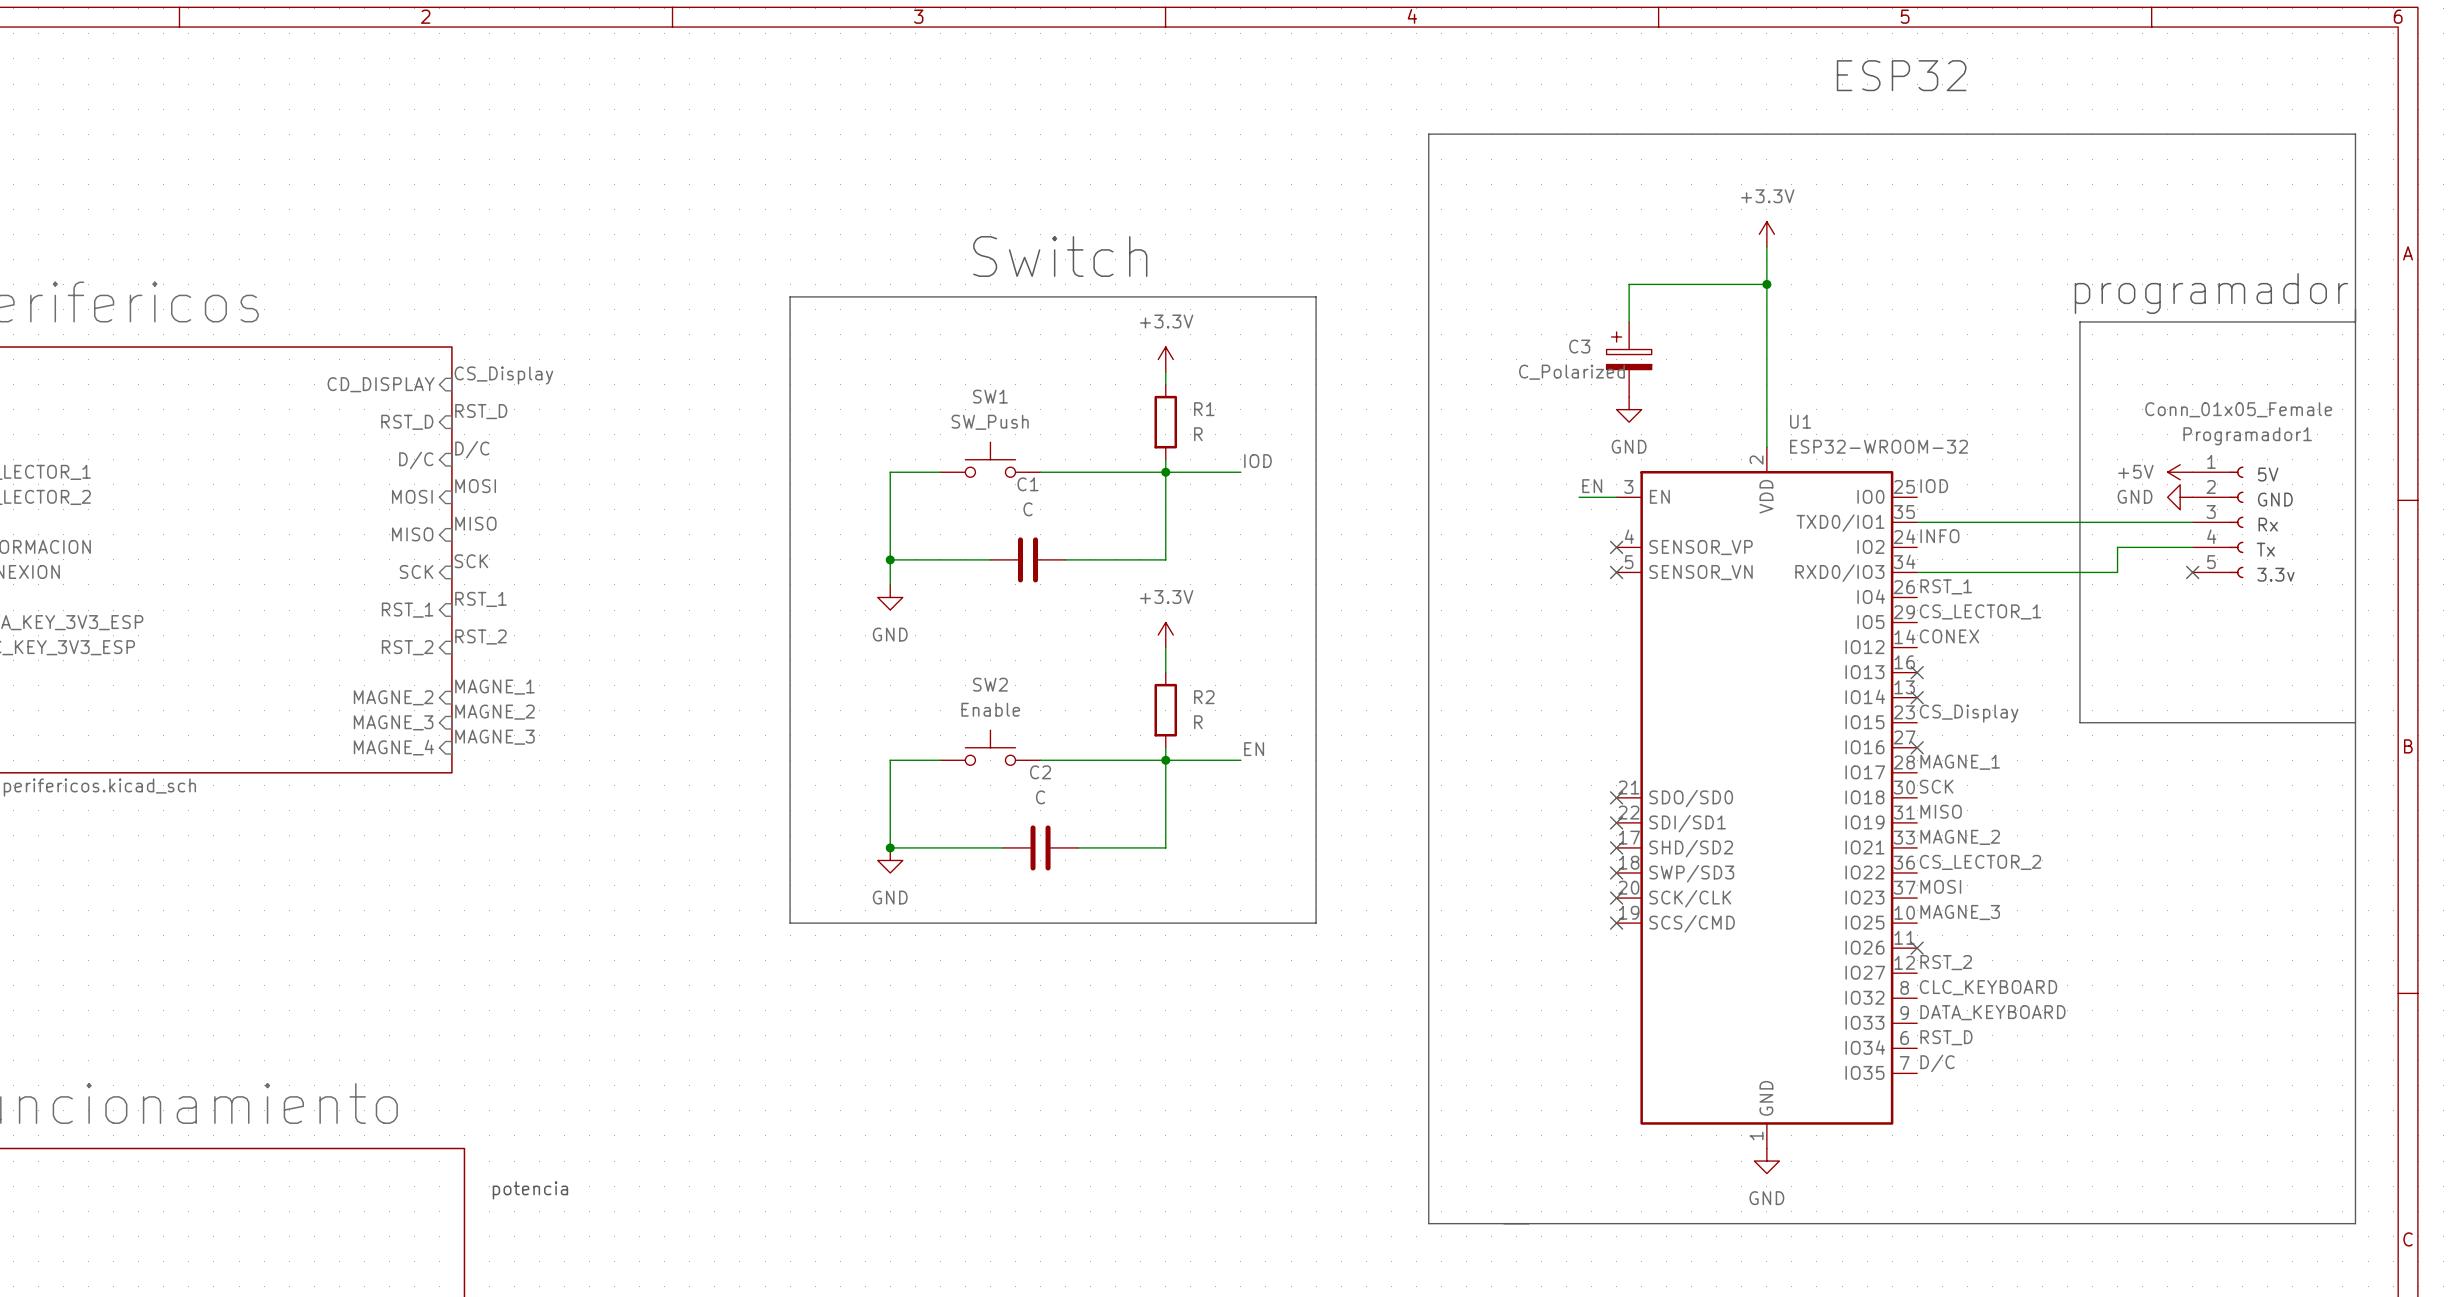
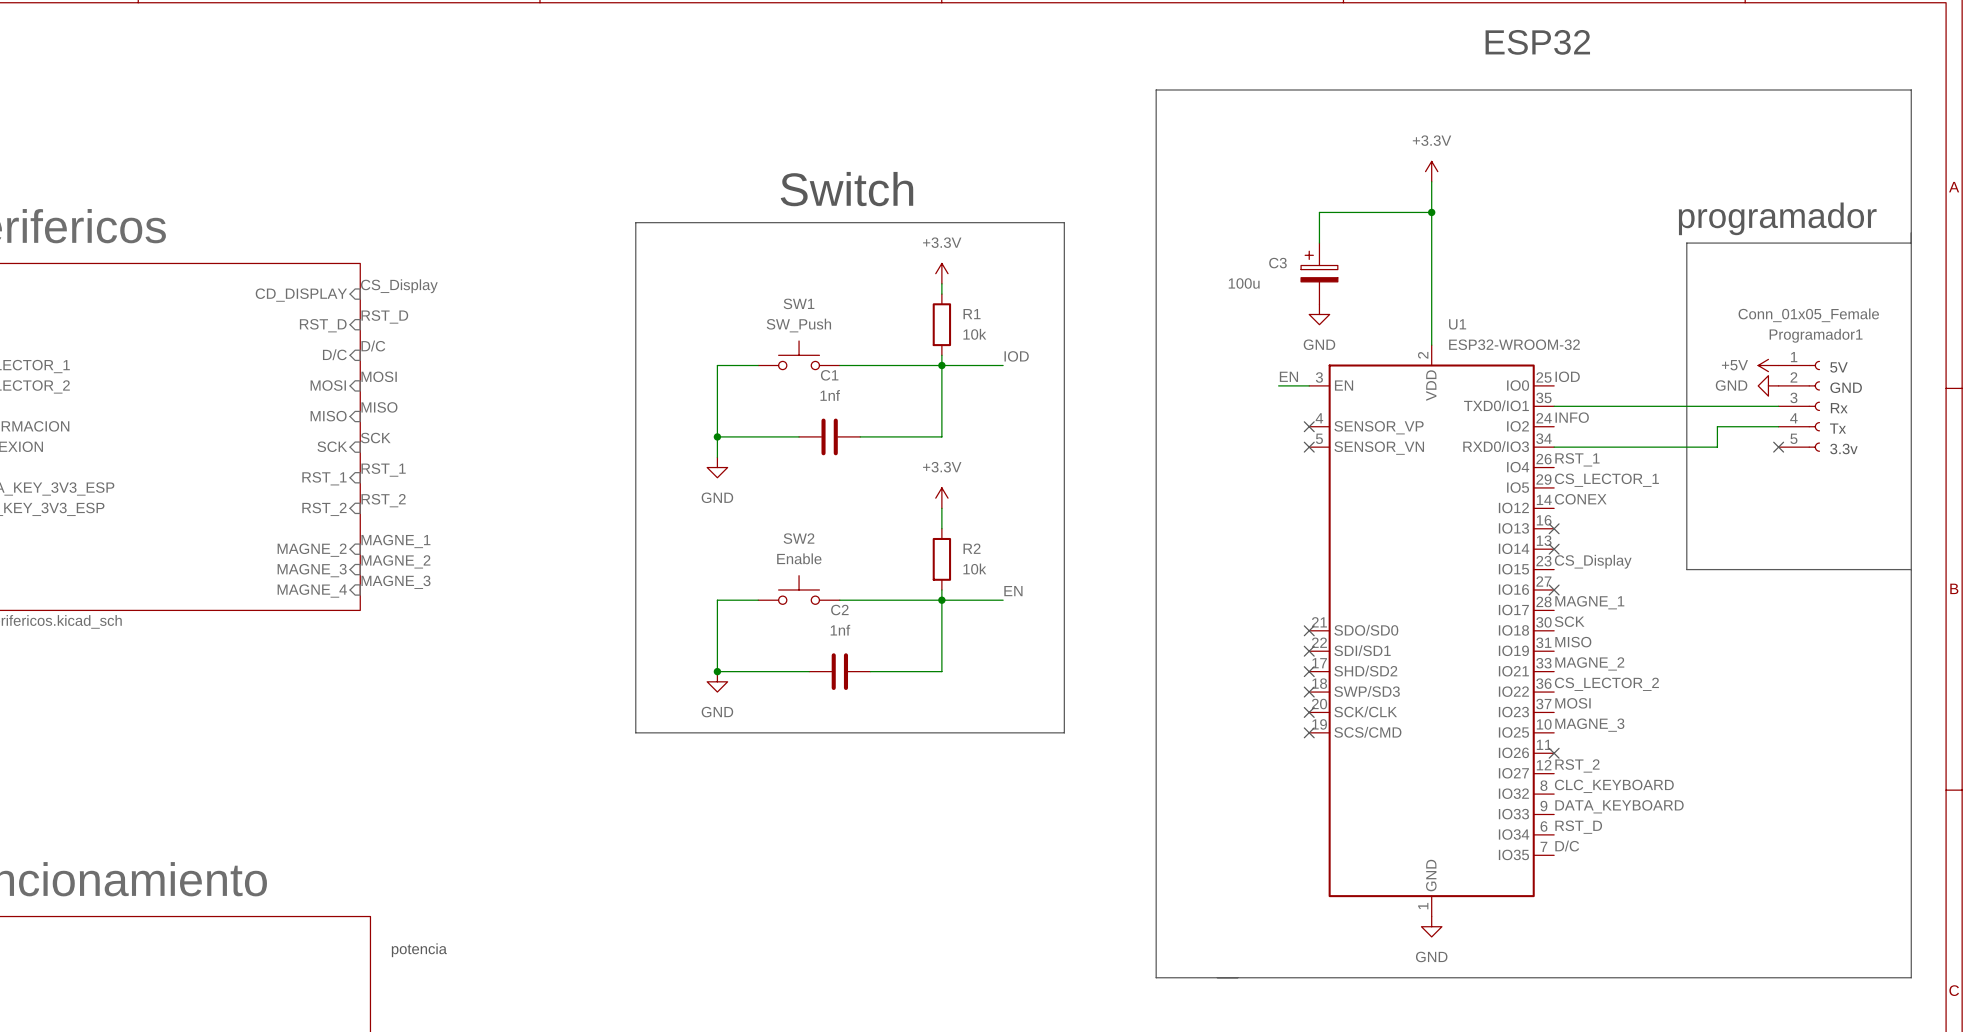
C3 value: C_Polarized (1571, 372) -> 100u (1244, 283)
R1 value: R (1198, 434) -> 10k (974, 334)
C1 value: C (1028, 509) -> 1nf (830, 395)
R2 value: R (1198, 722) -> 10k (974, 569)
C2 value: C (1040, 797) -> 1nf (840, 630)

